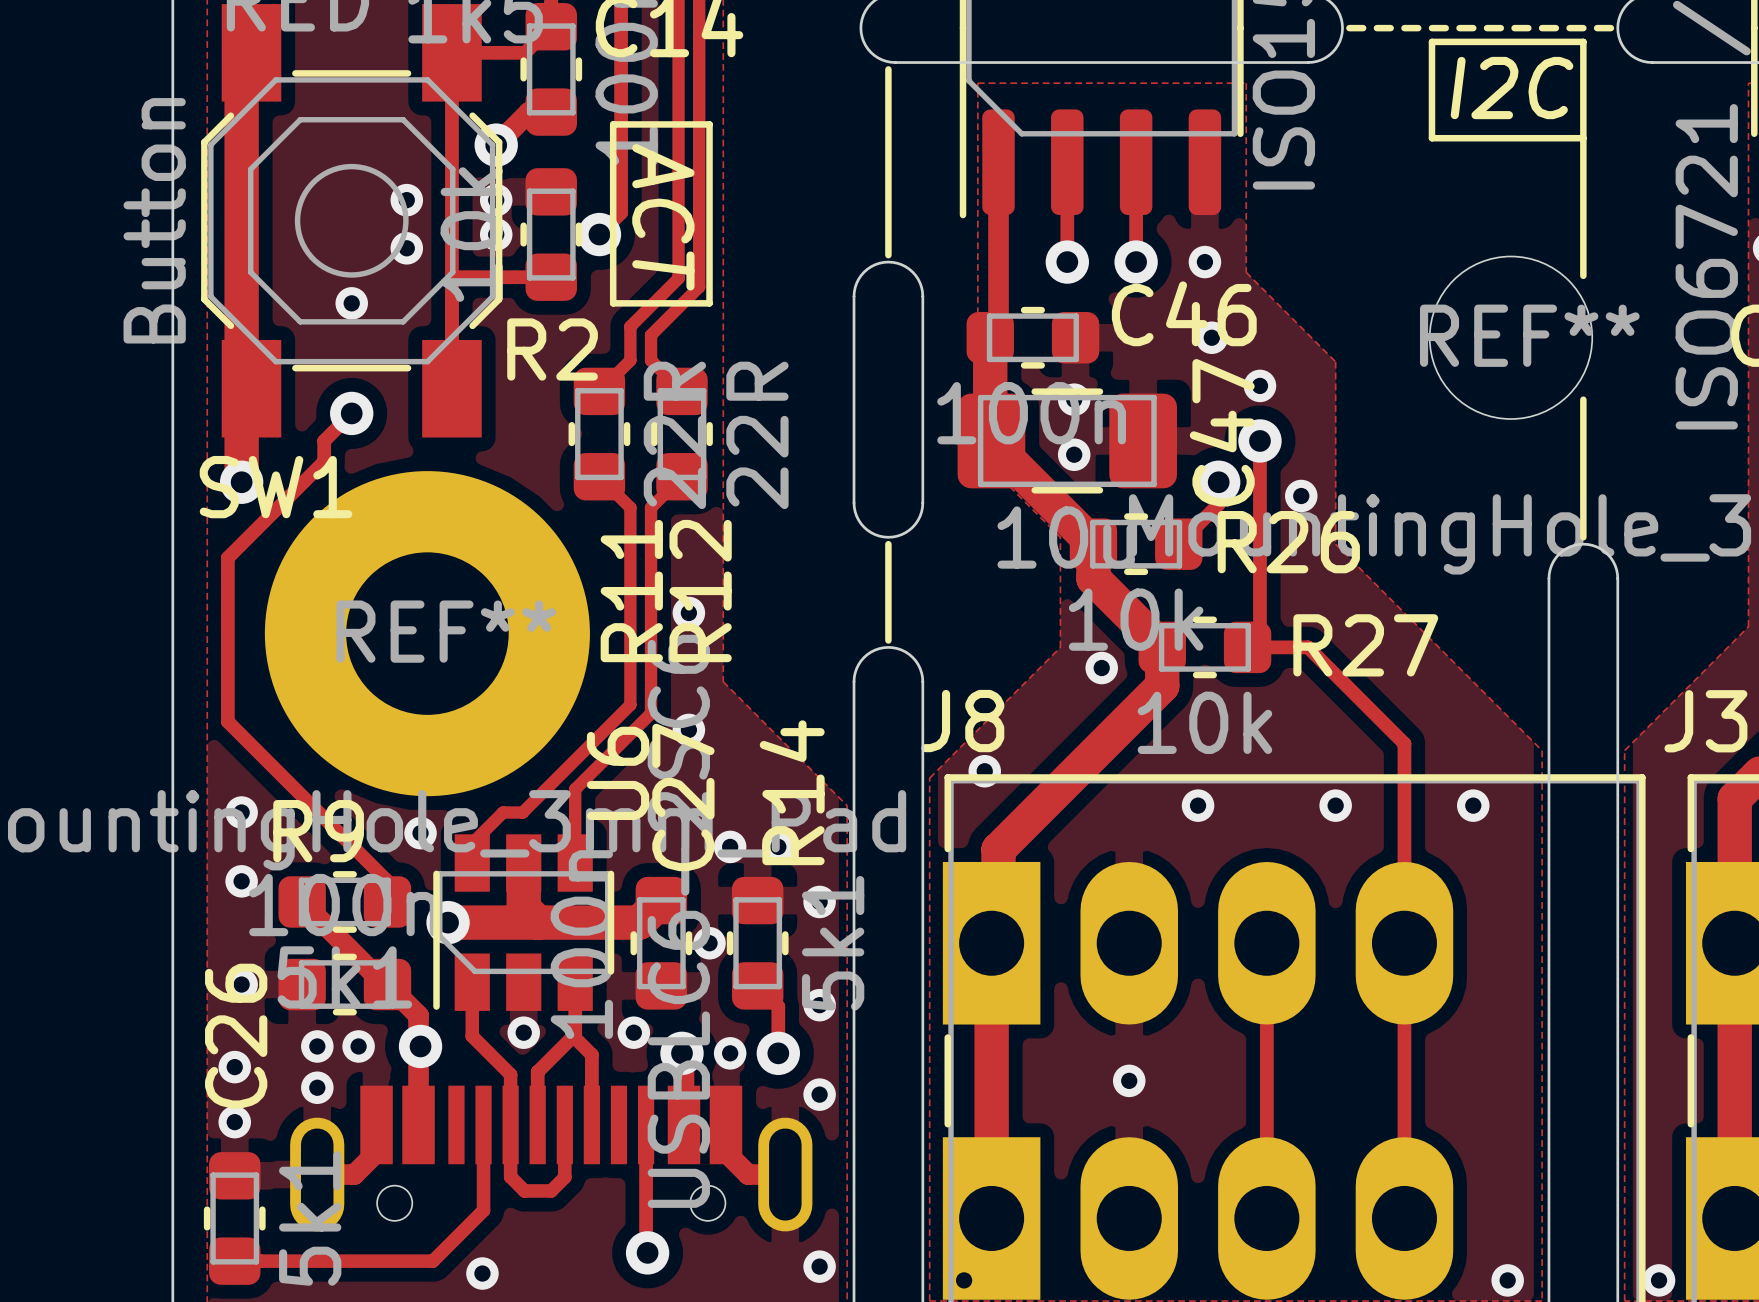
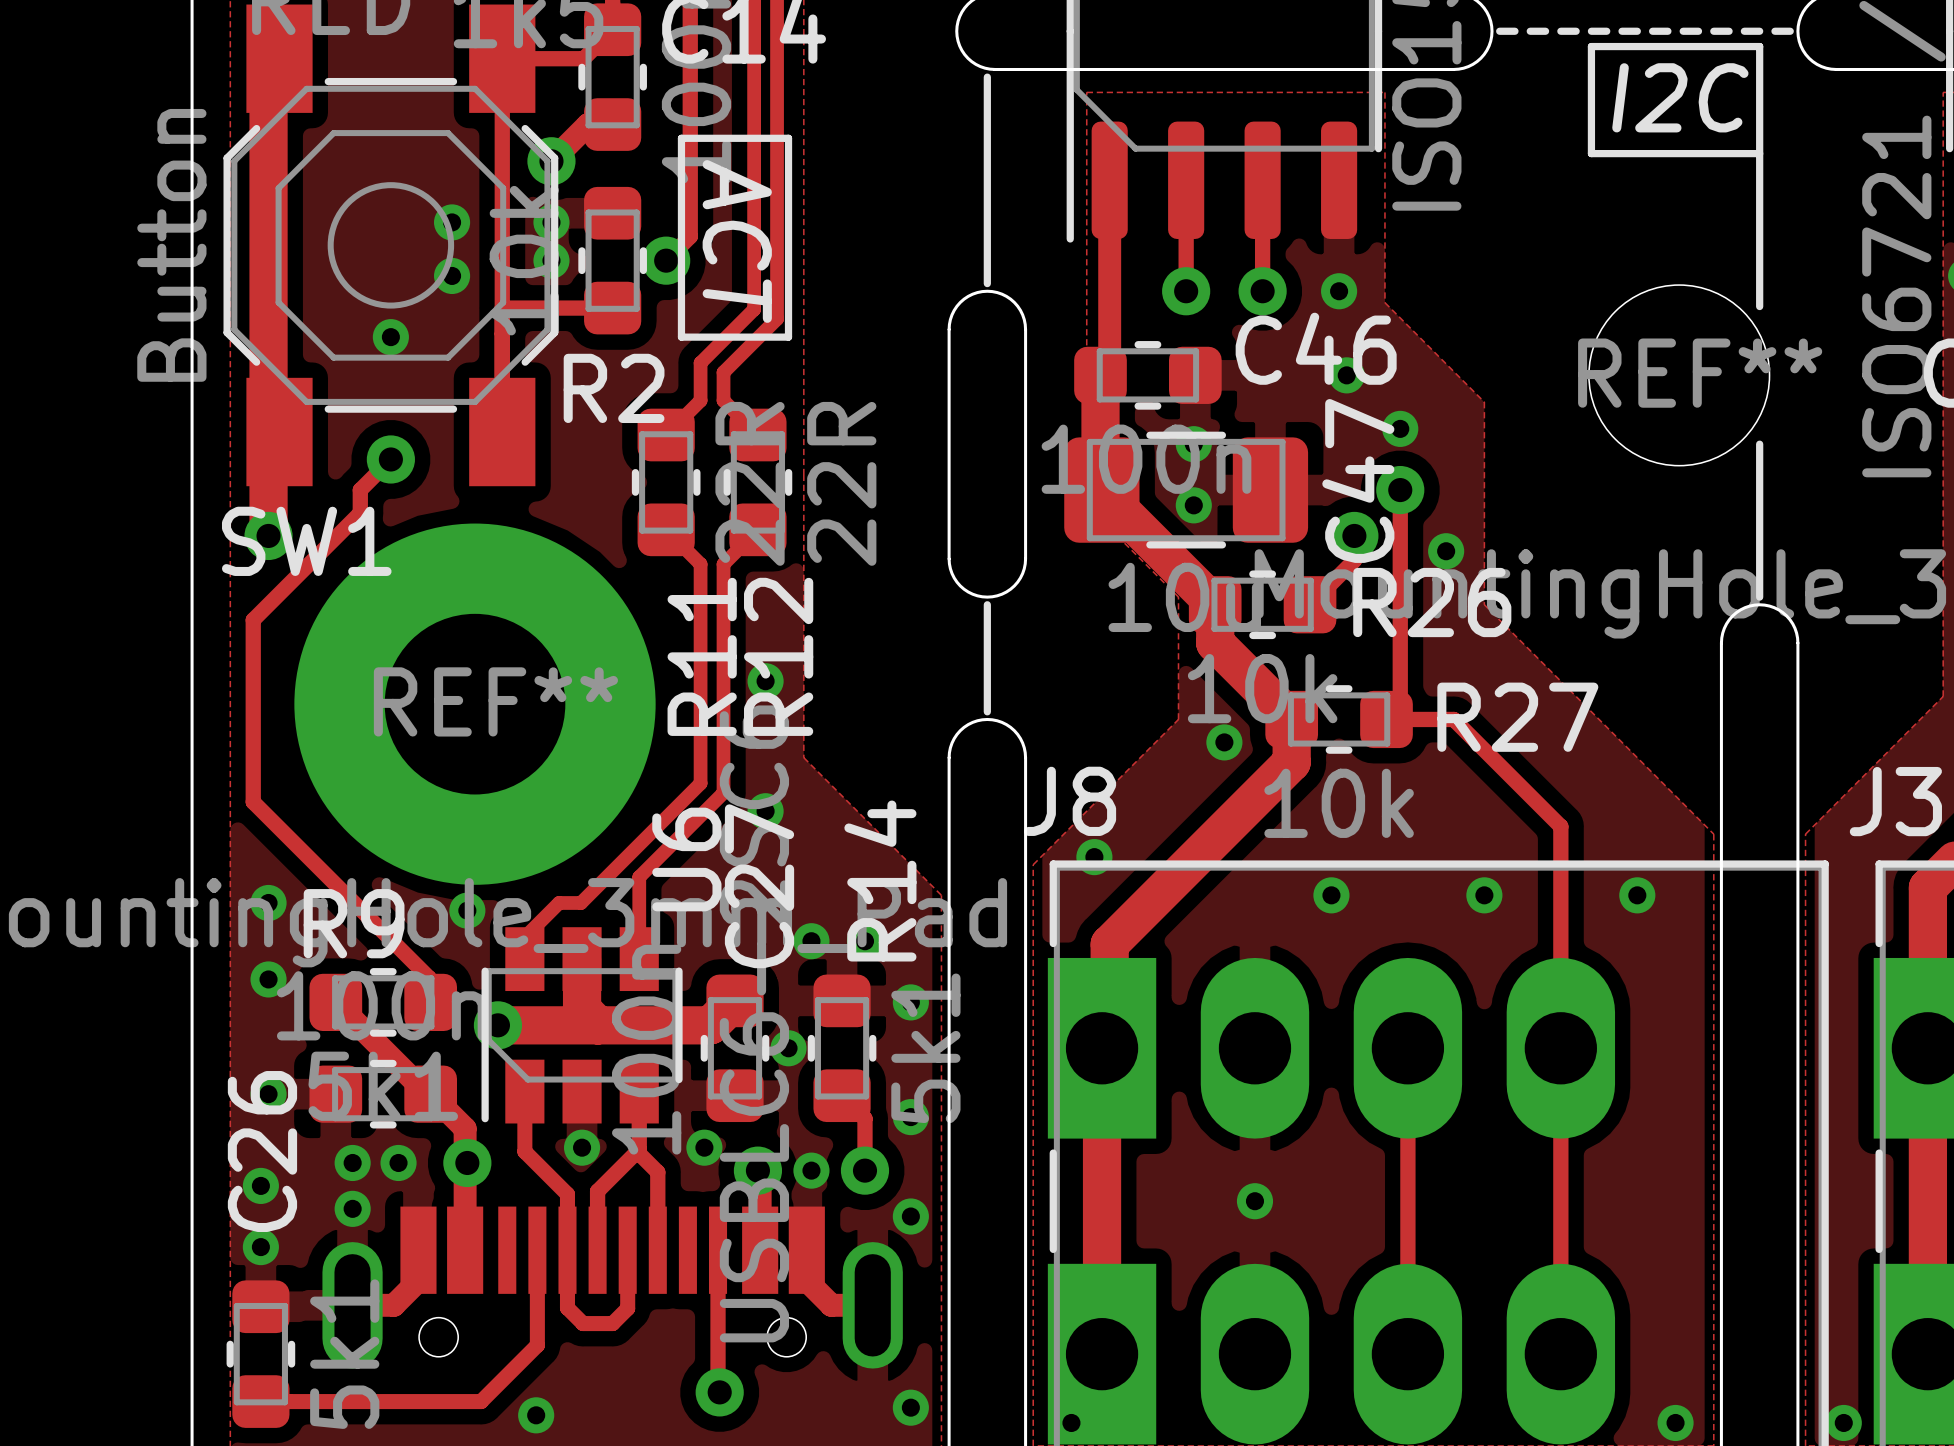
via position: (420, 833) -> (467, 910)

